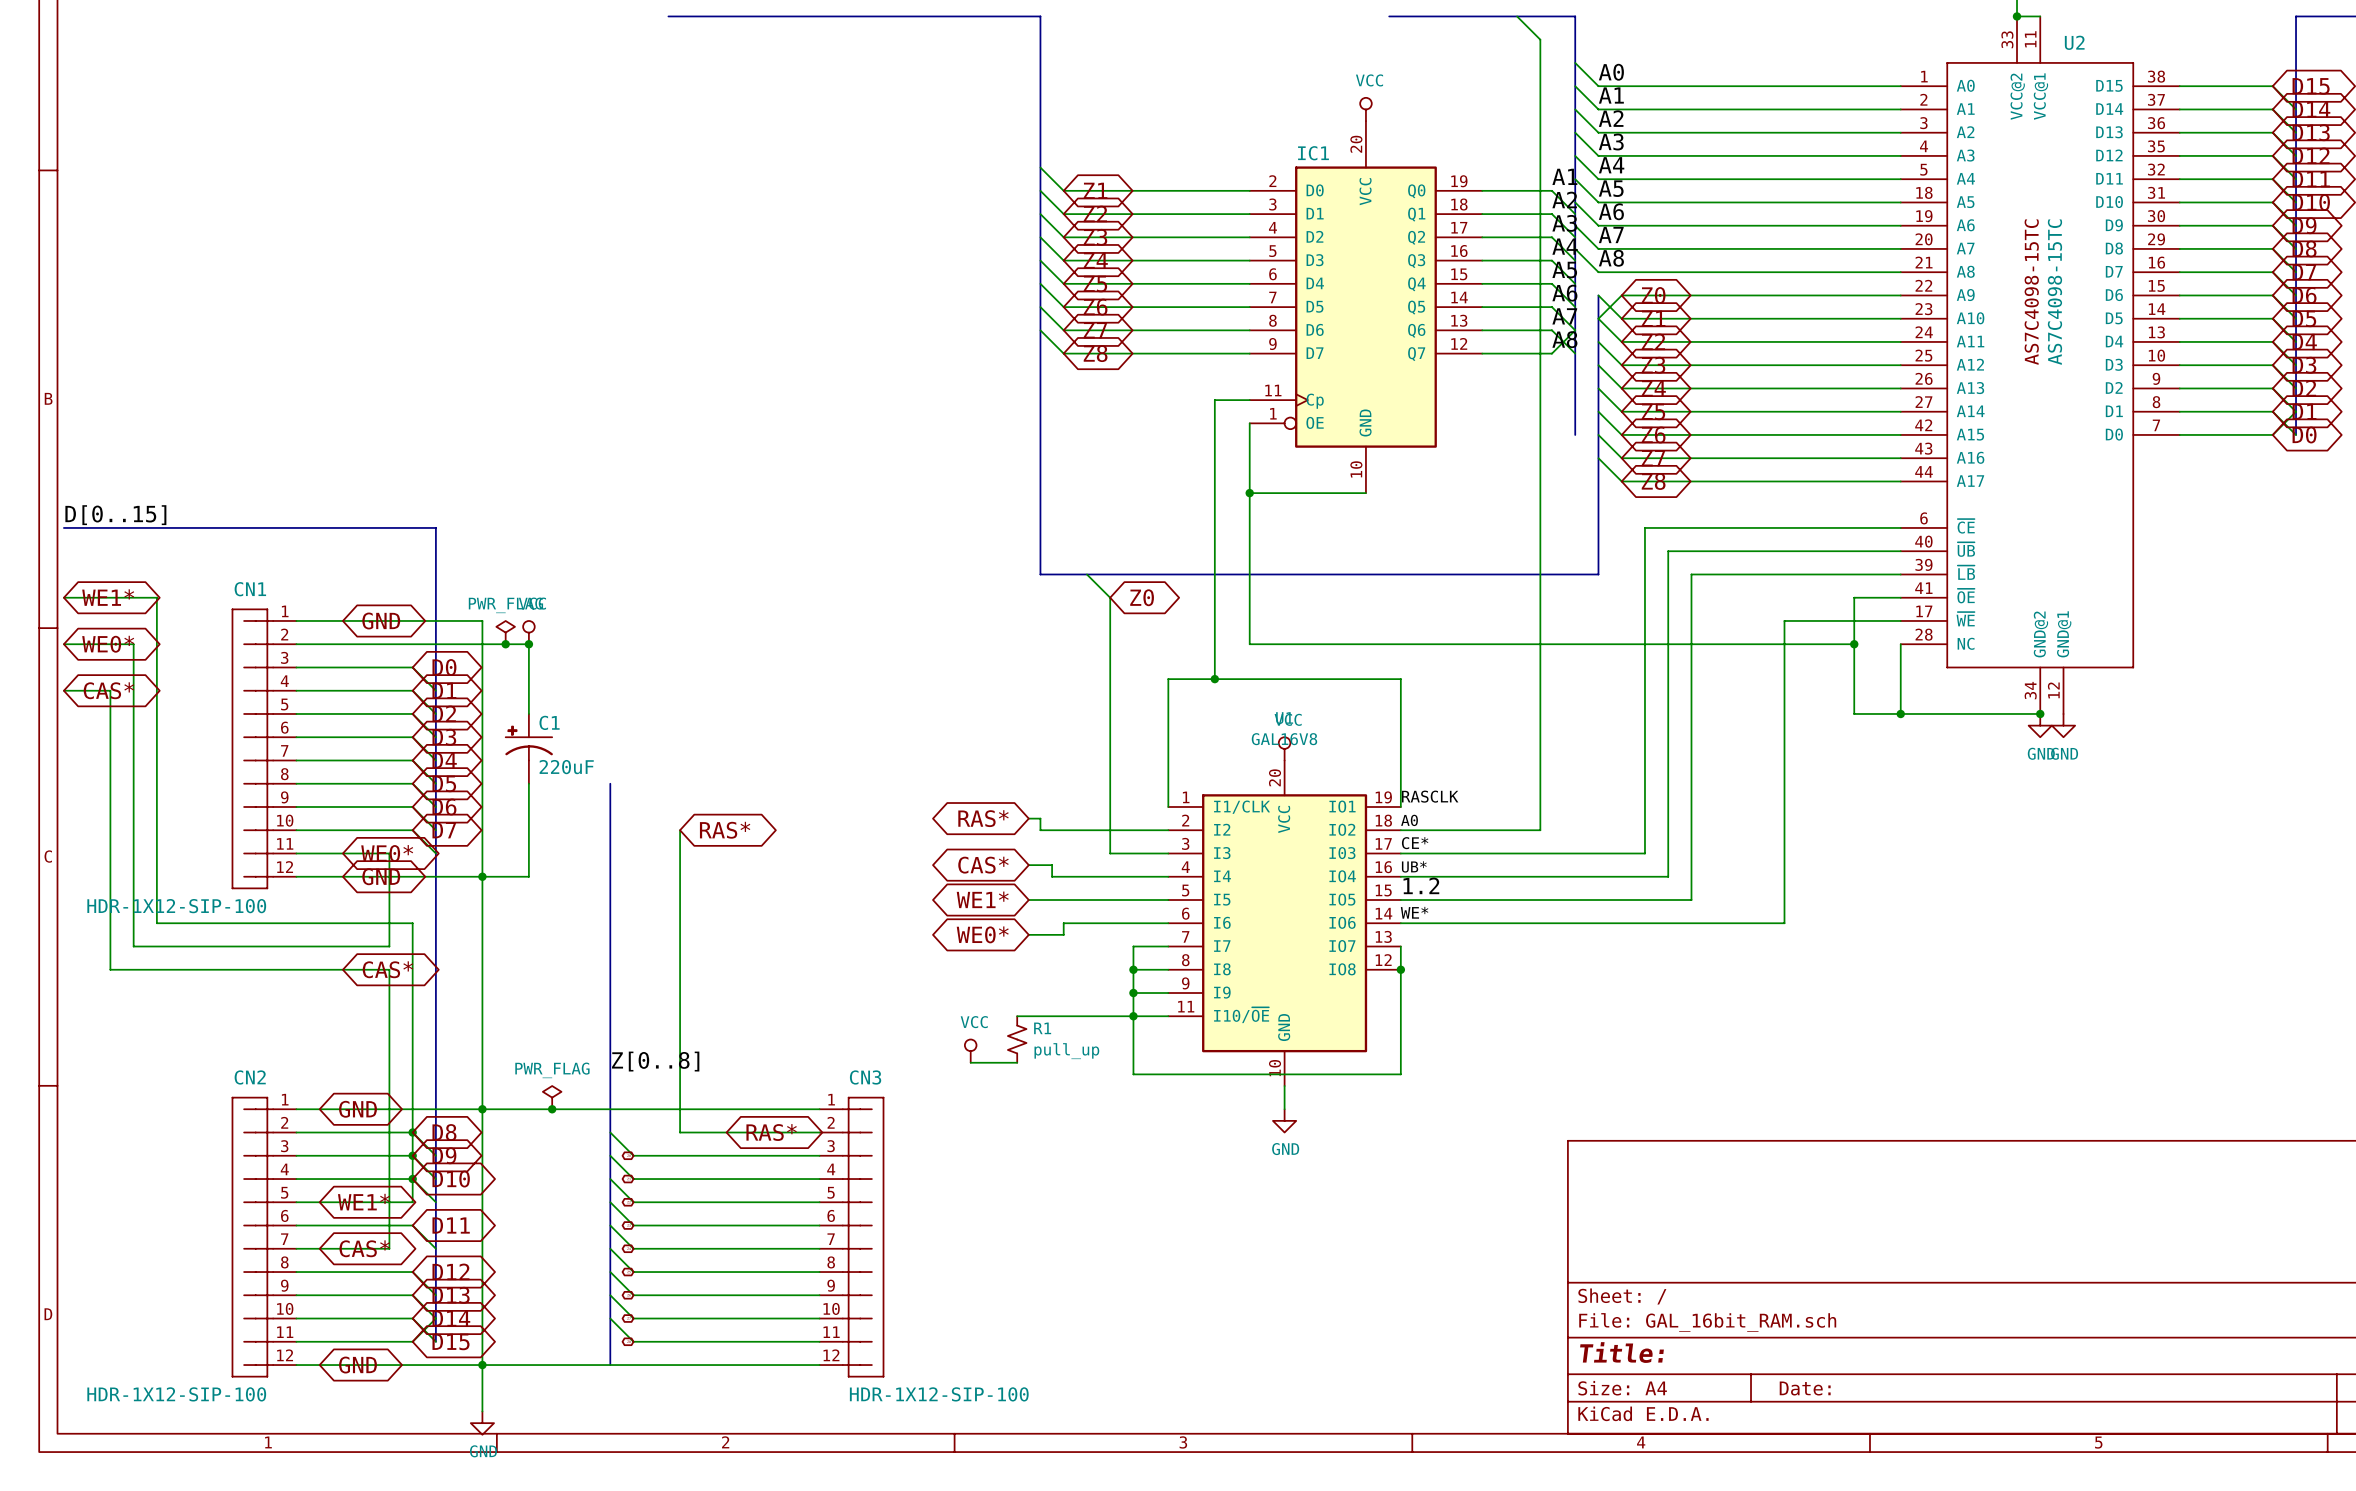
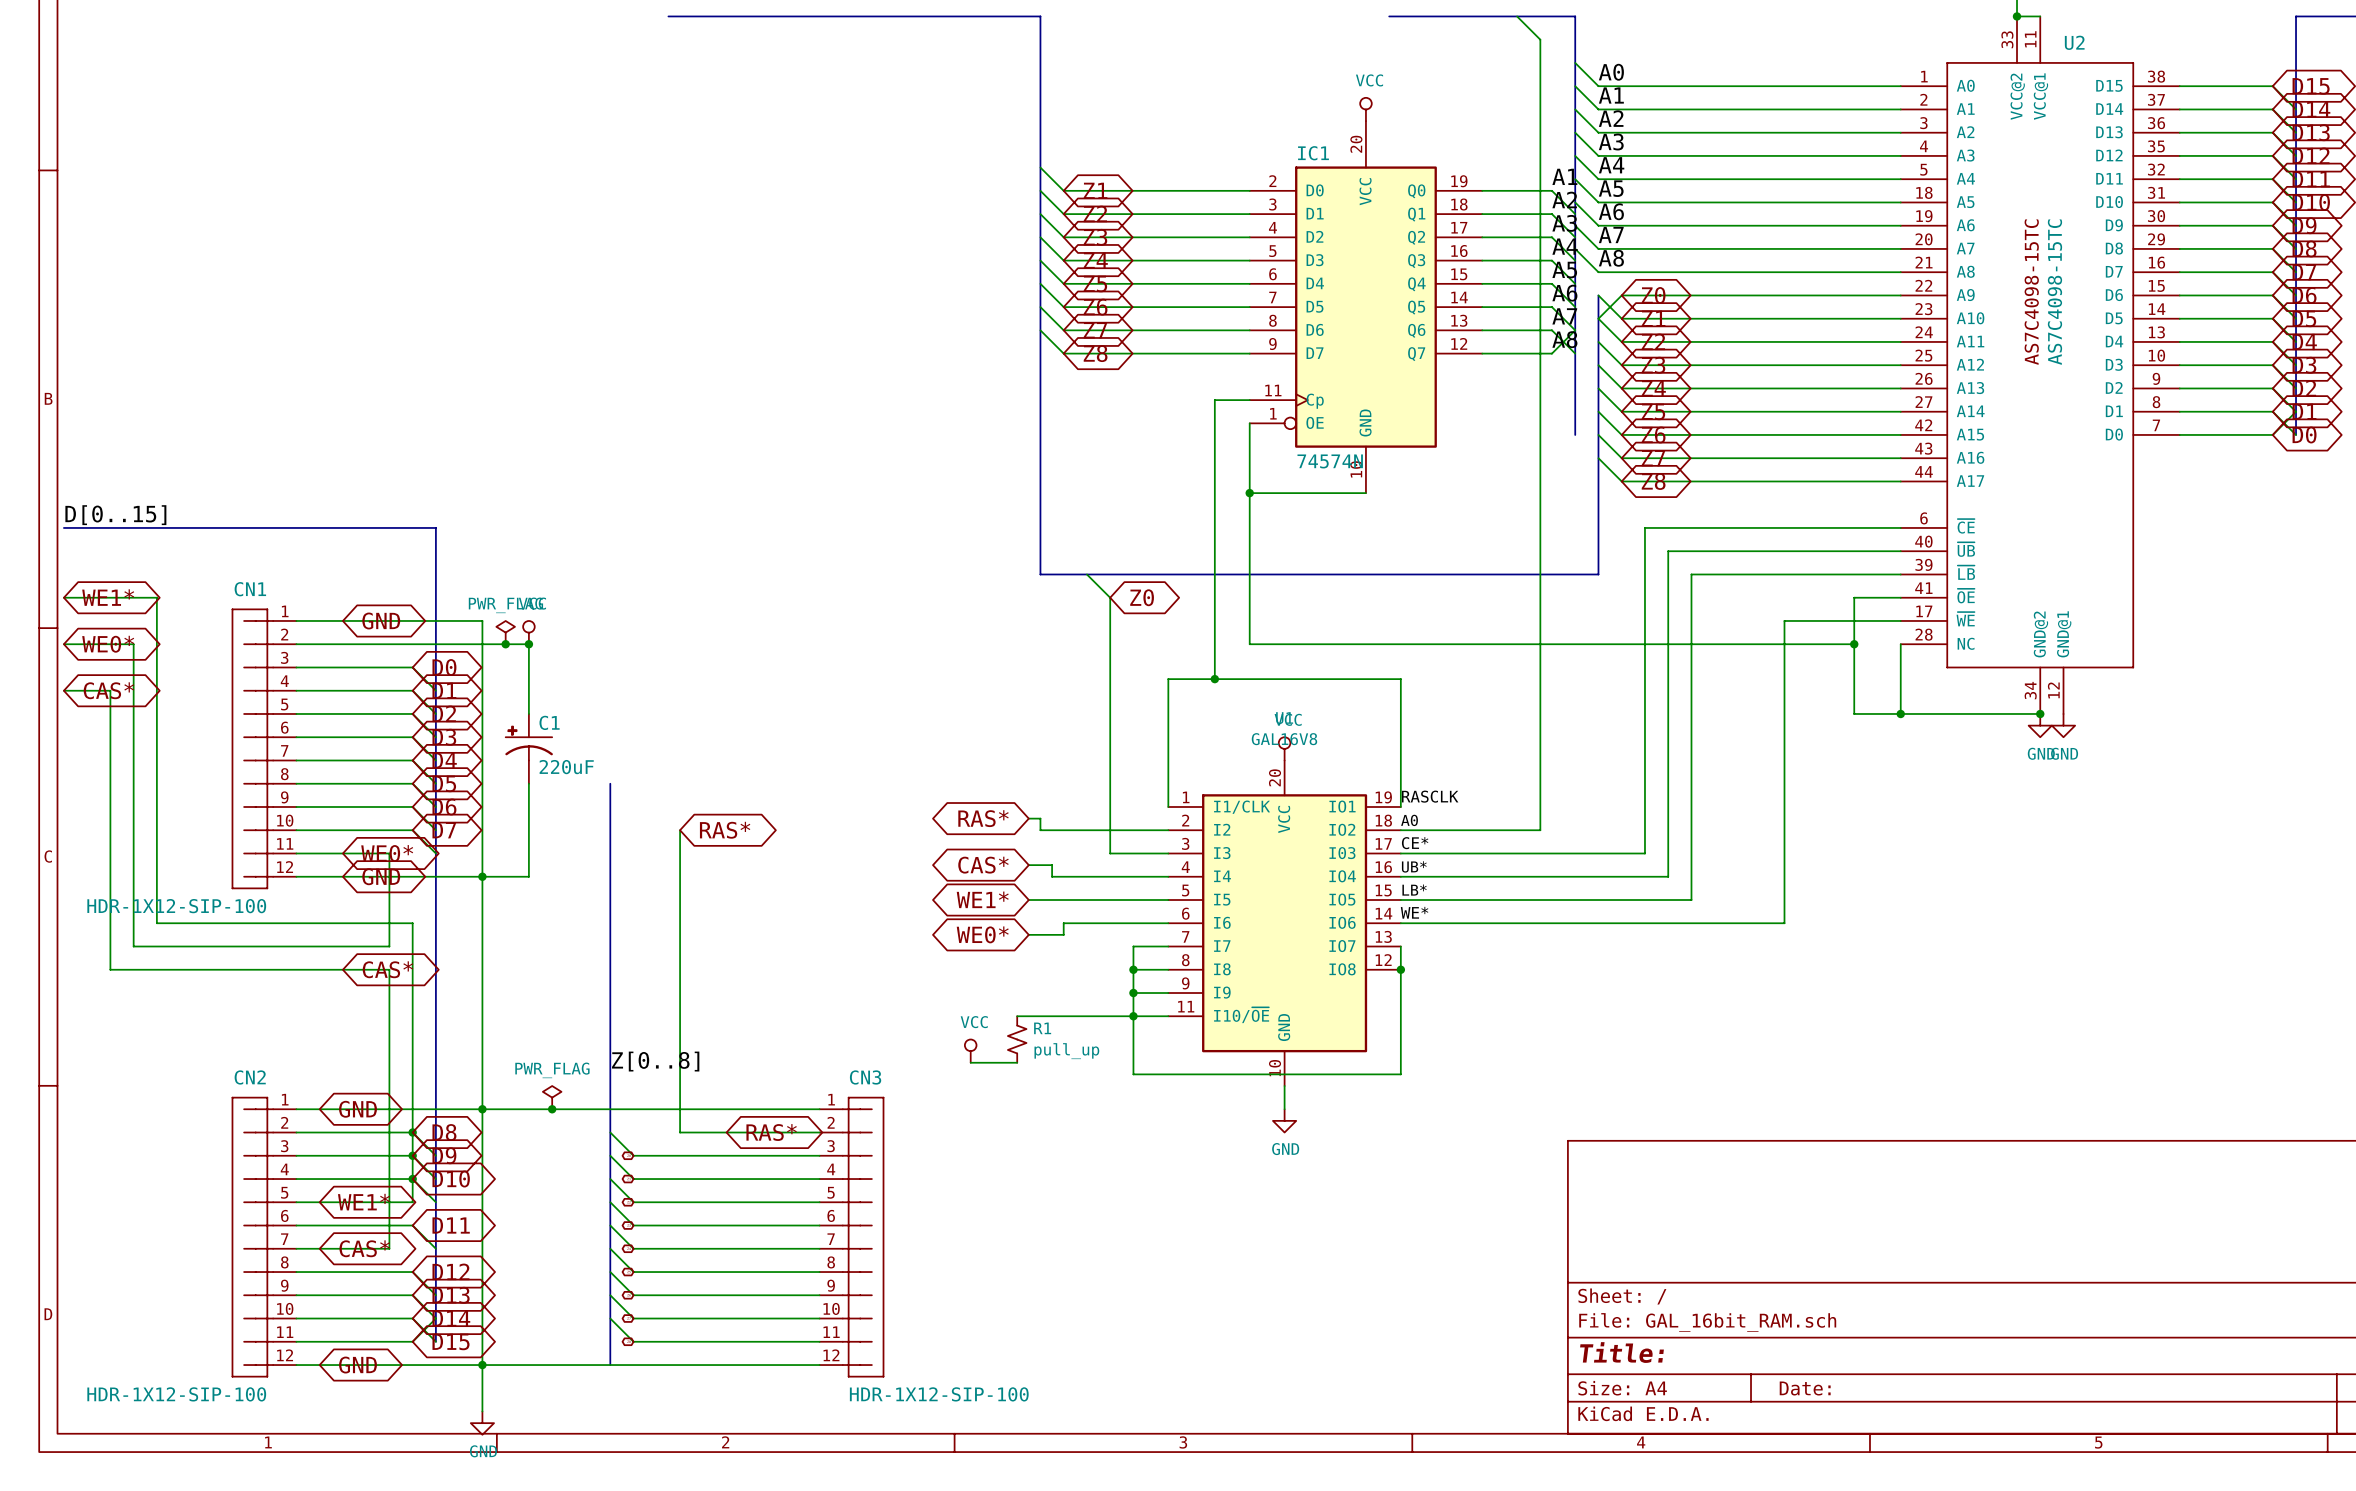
IC1 value: none -> 74574N (1330, 461)
label: 1.2 (1421, 885) -> LB* (1414, 890)

